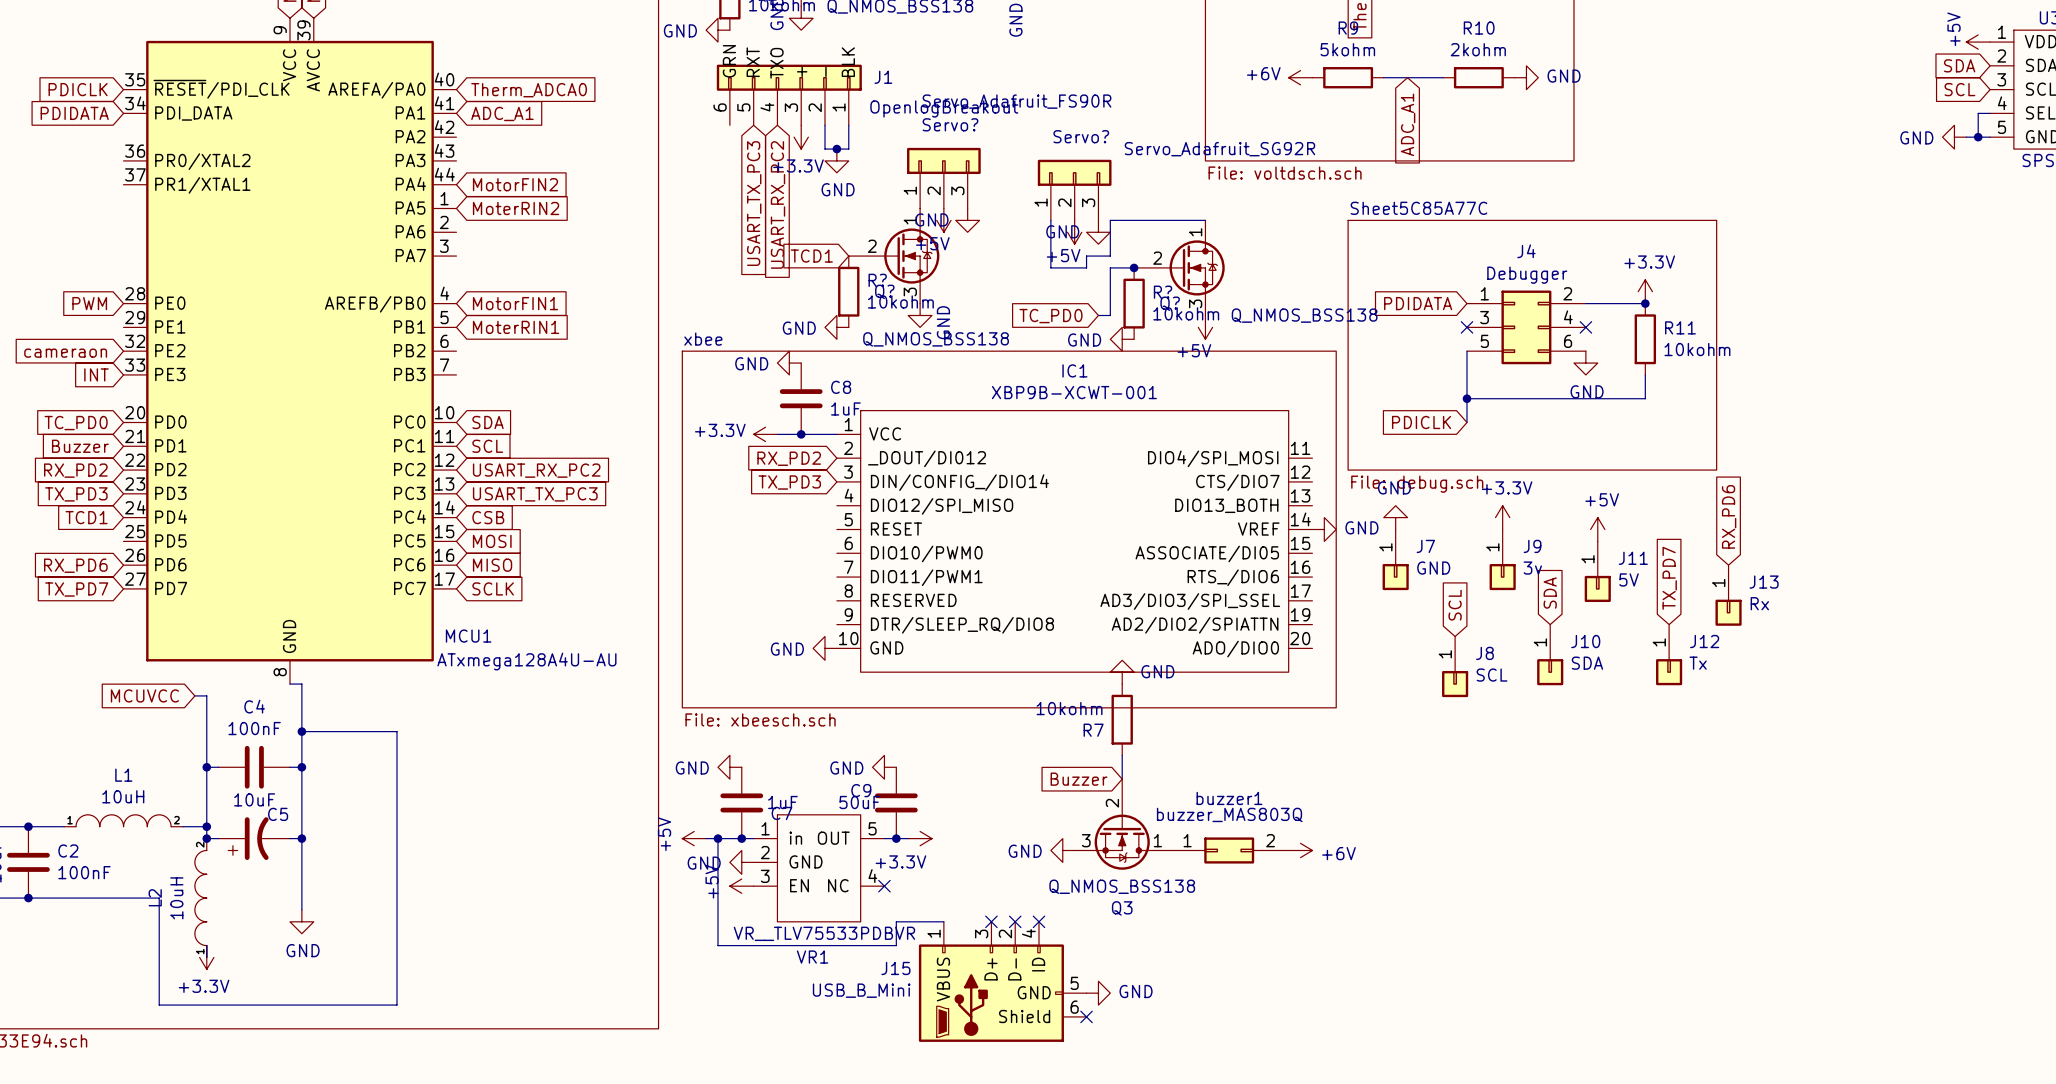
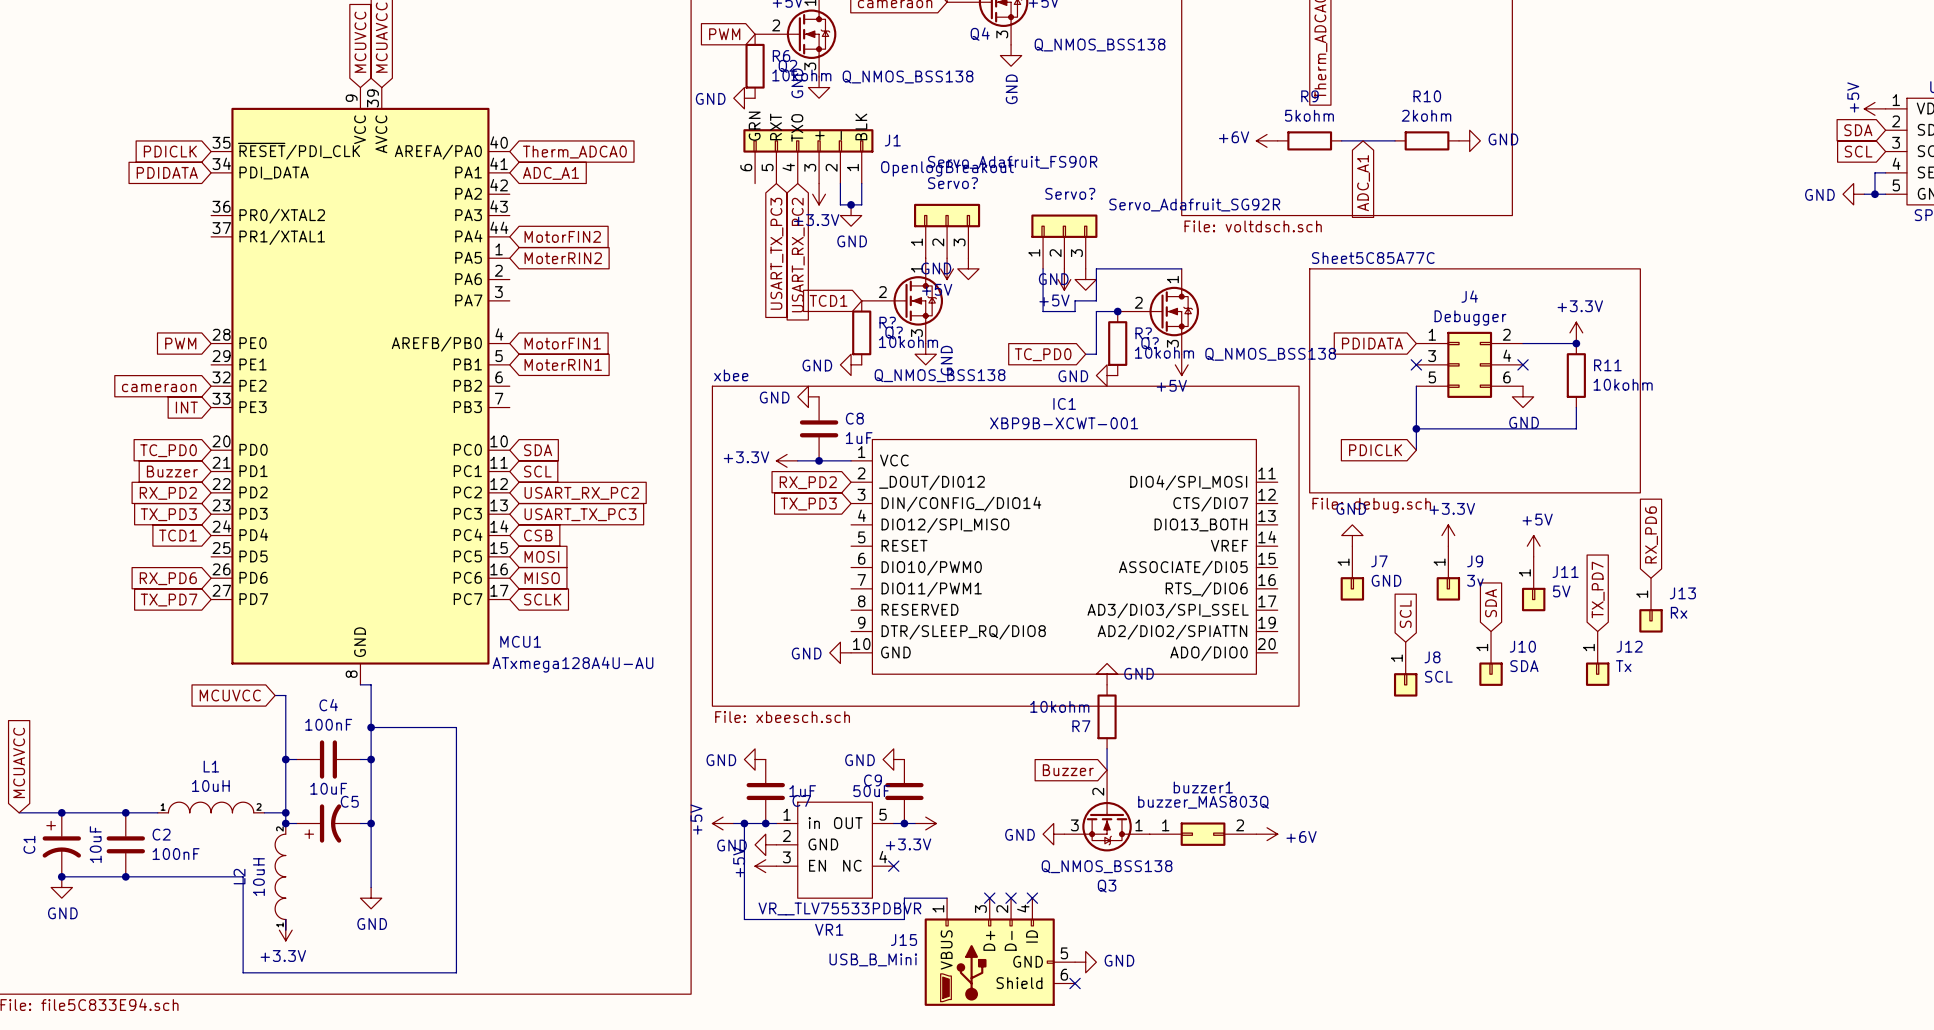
power symbol: GND (1324, 529) -> none

